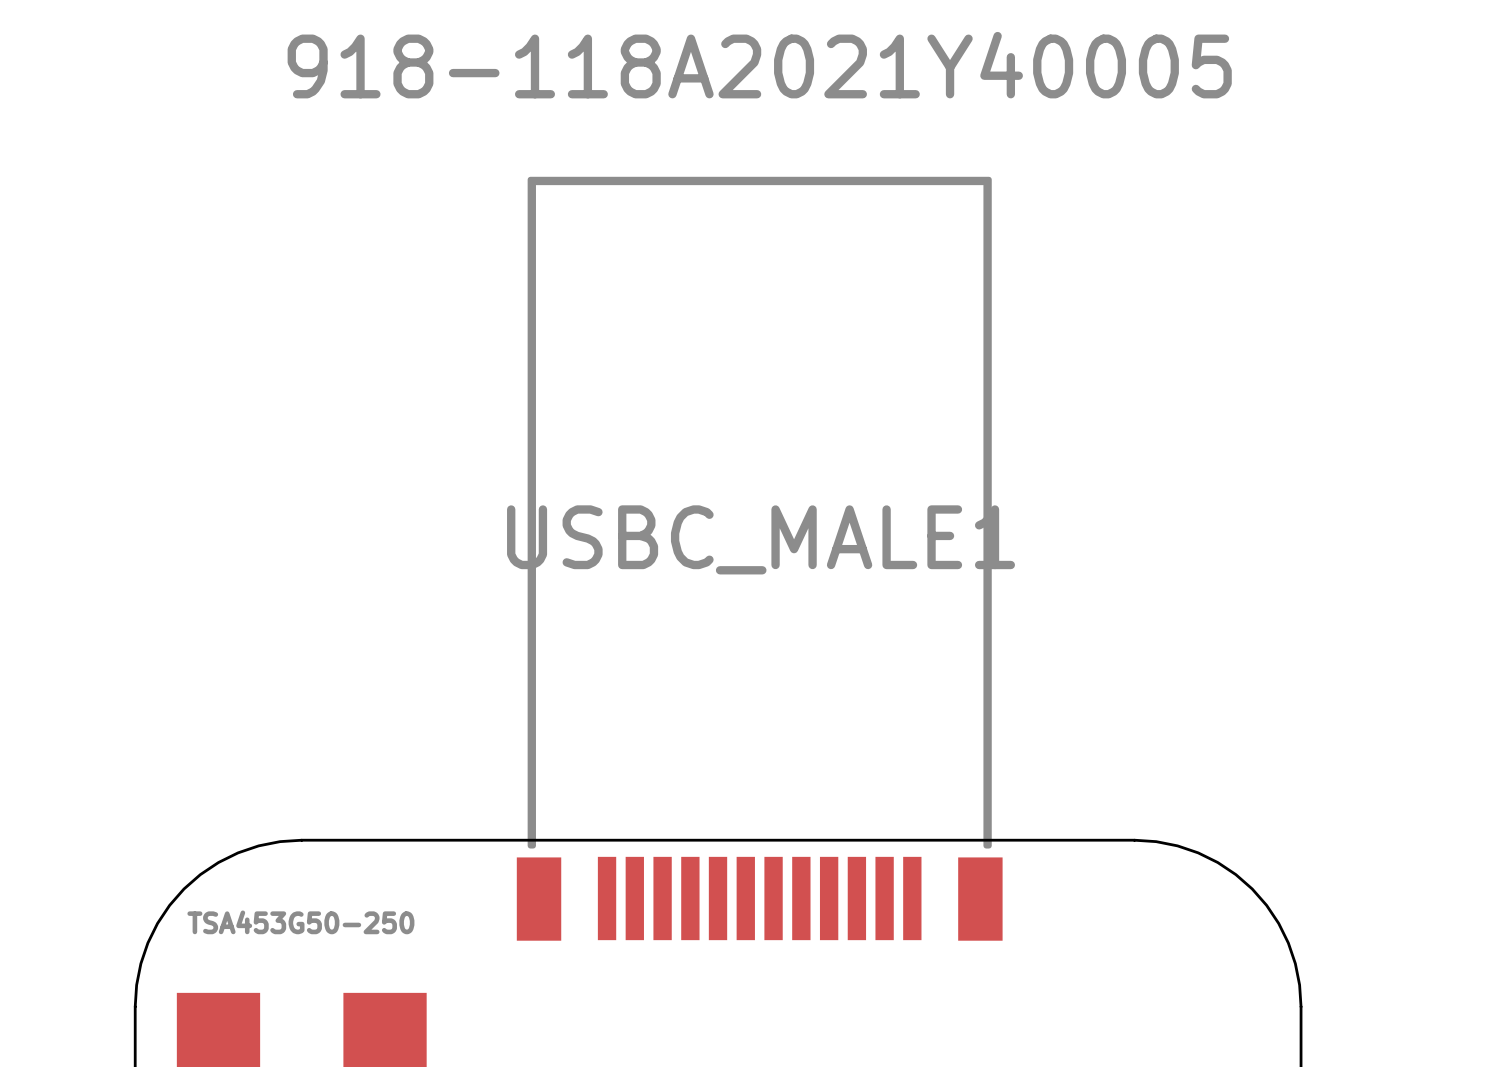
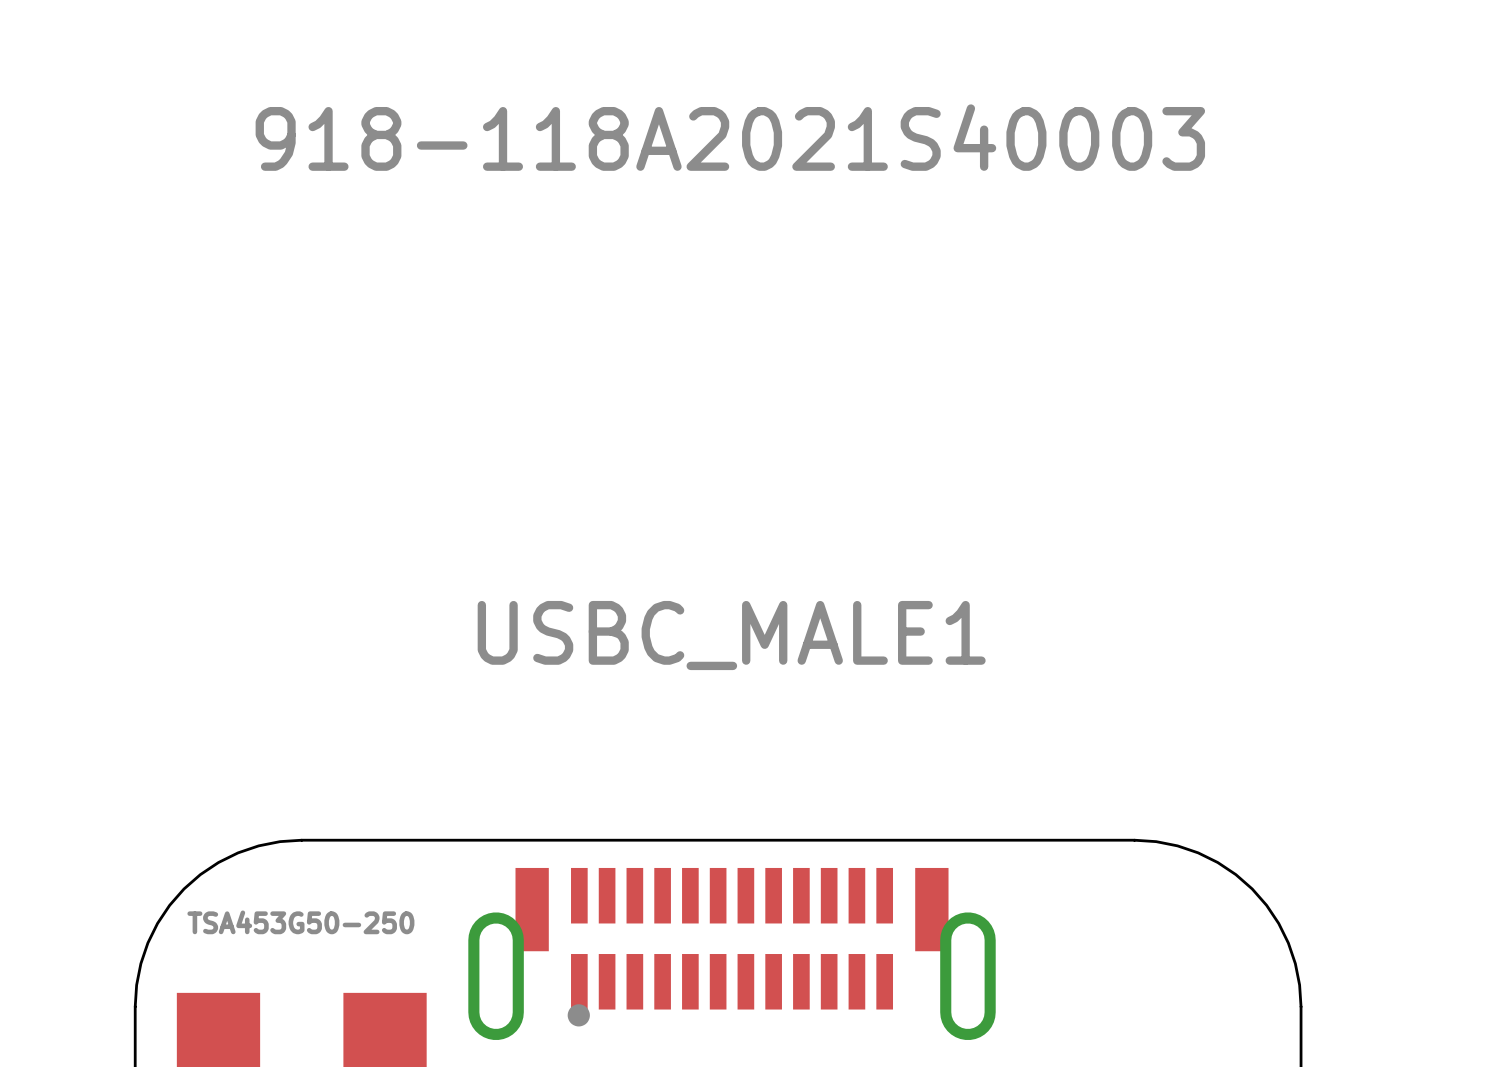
USBC_MALE1 value: 918-118A2021Y40005 (759, 65) -> 918-118A2021S40003 (730, 137)
USBC_MALE1 footprint: [516, 176, 1003, 941] -> [468, 867, 996, 1041]
USBC_MALE1 name position: USBC_MALE1 (761, 539) -> USBC_MALE1 (731, 635)

